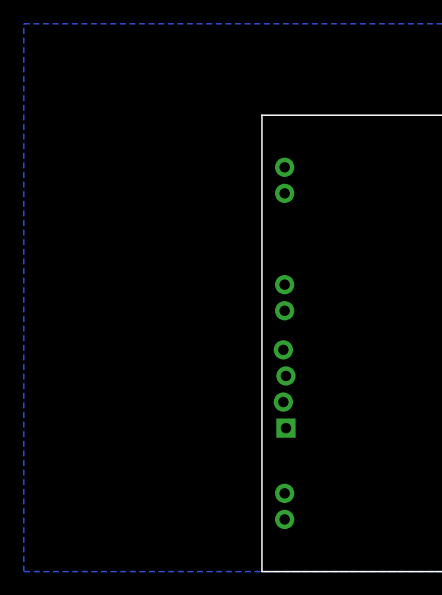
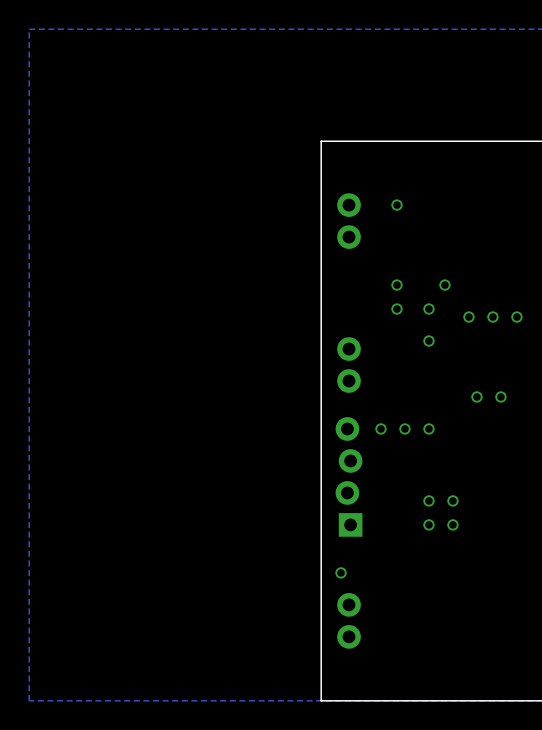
via: none -> (396, 205)
via: none -> (396, 285)
via: none -> (444, 285)
via: none -> (396, 309)
via: none -> (428, 309)
via: none -> (468, 317)
via: none -> (492, 317)
via: none -> (516, 317)
via: none -> (428, 341)
via: none -> (476, 396)
via: none -> (500, 396)
via: none -> (381, 428)
via: none -> (404, 428)
via: none -> (428, 428)
via: none -> (428, 500)
via: none -> (452, 500)
via: none -> (428, 524)
via: none -> (452, 524)
via: none -> (341, 572)

